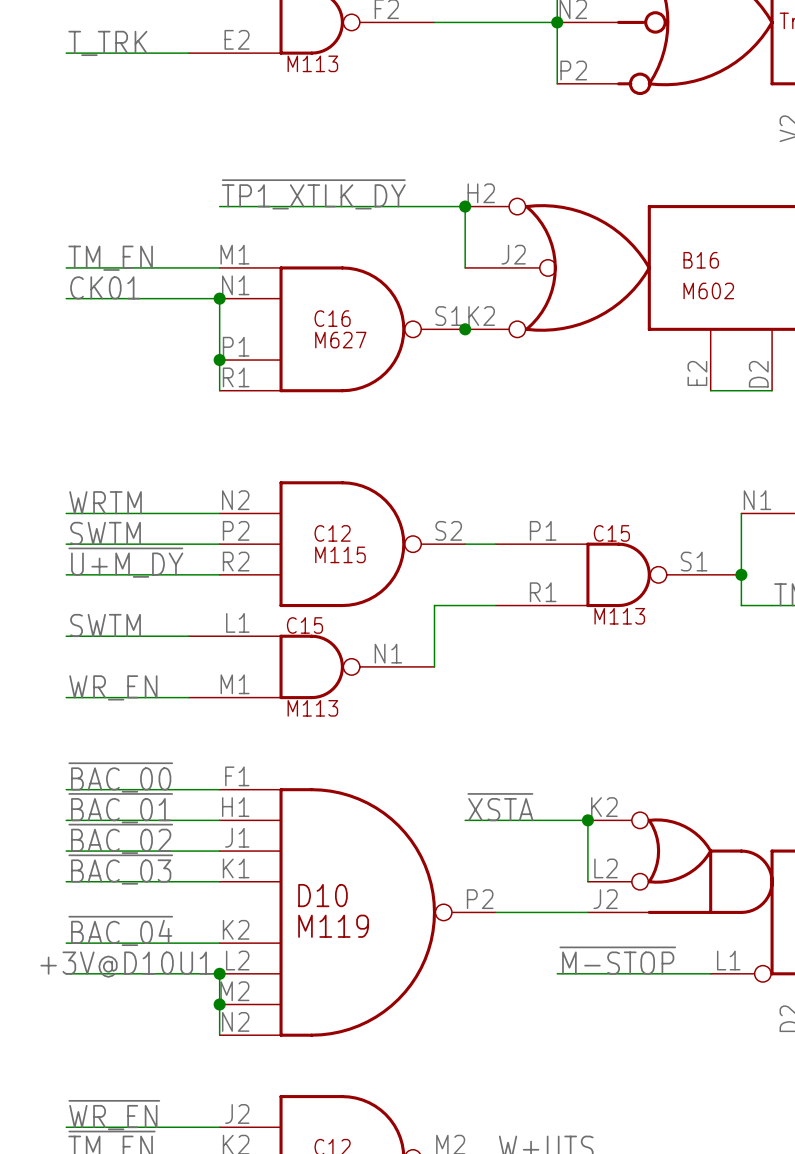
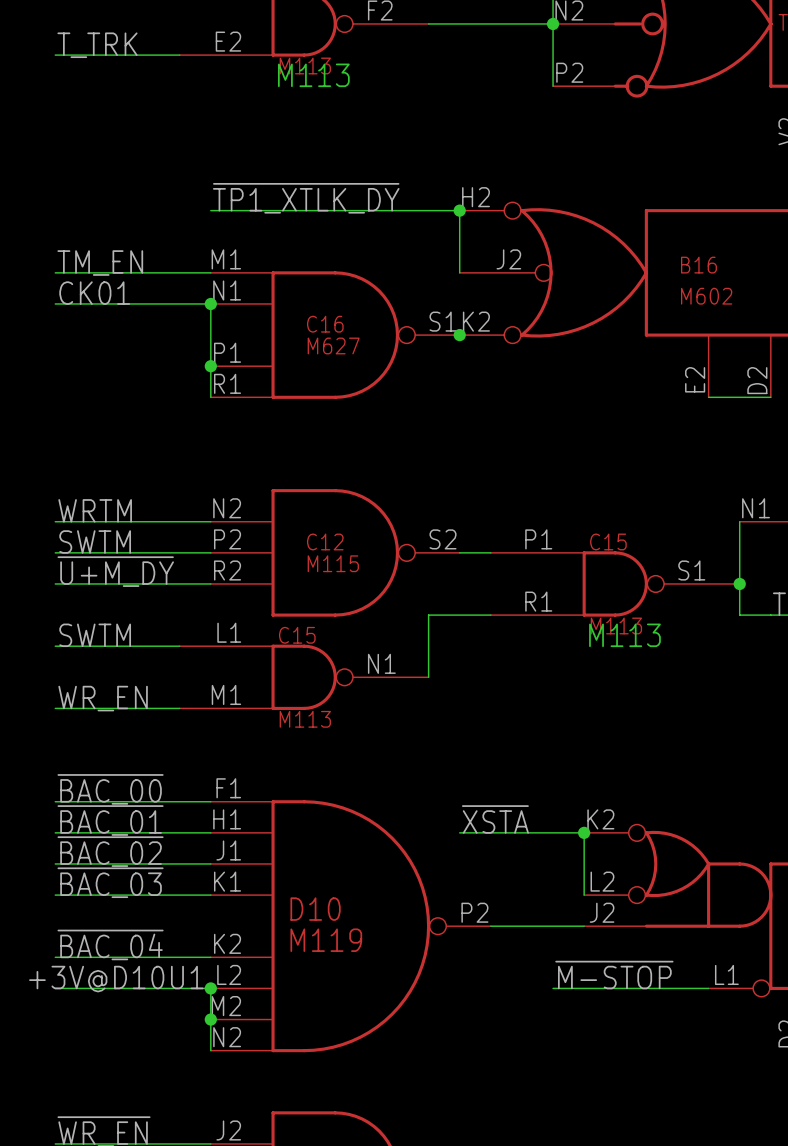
text: none -> M113 (313, 75)
text: none -> M113 (624, 635)

